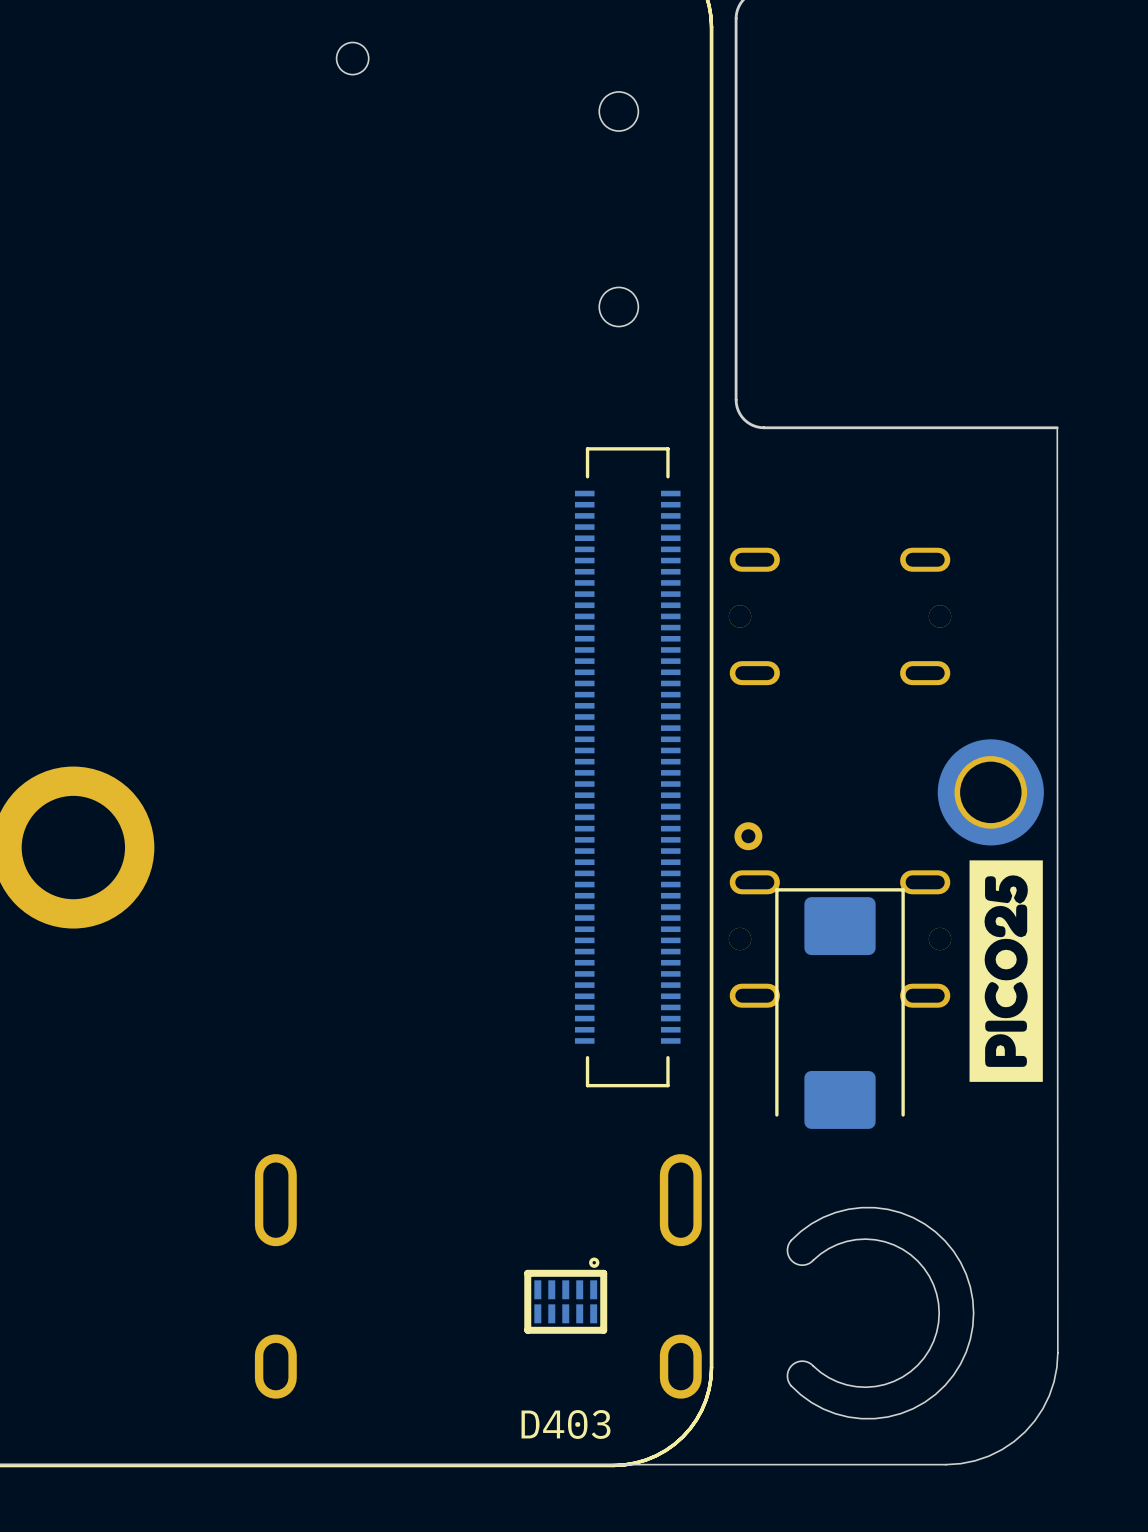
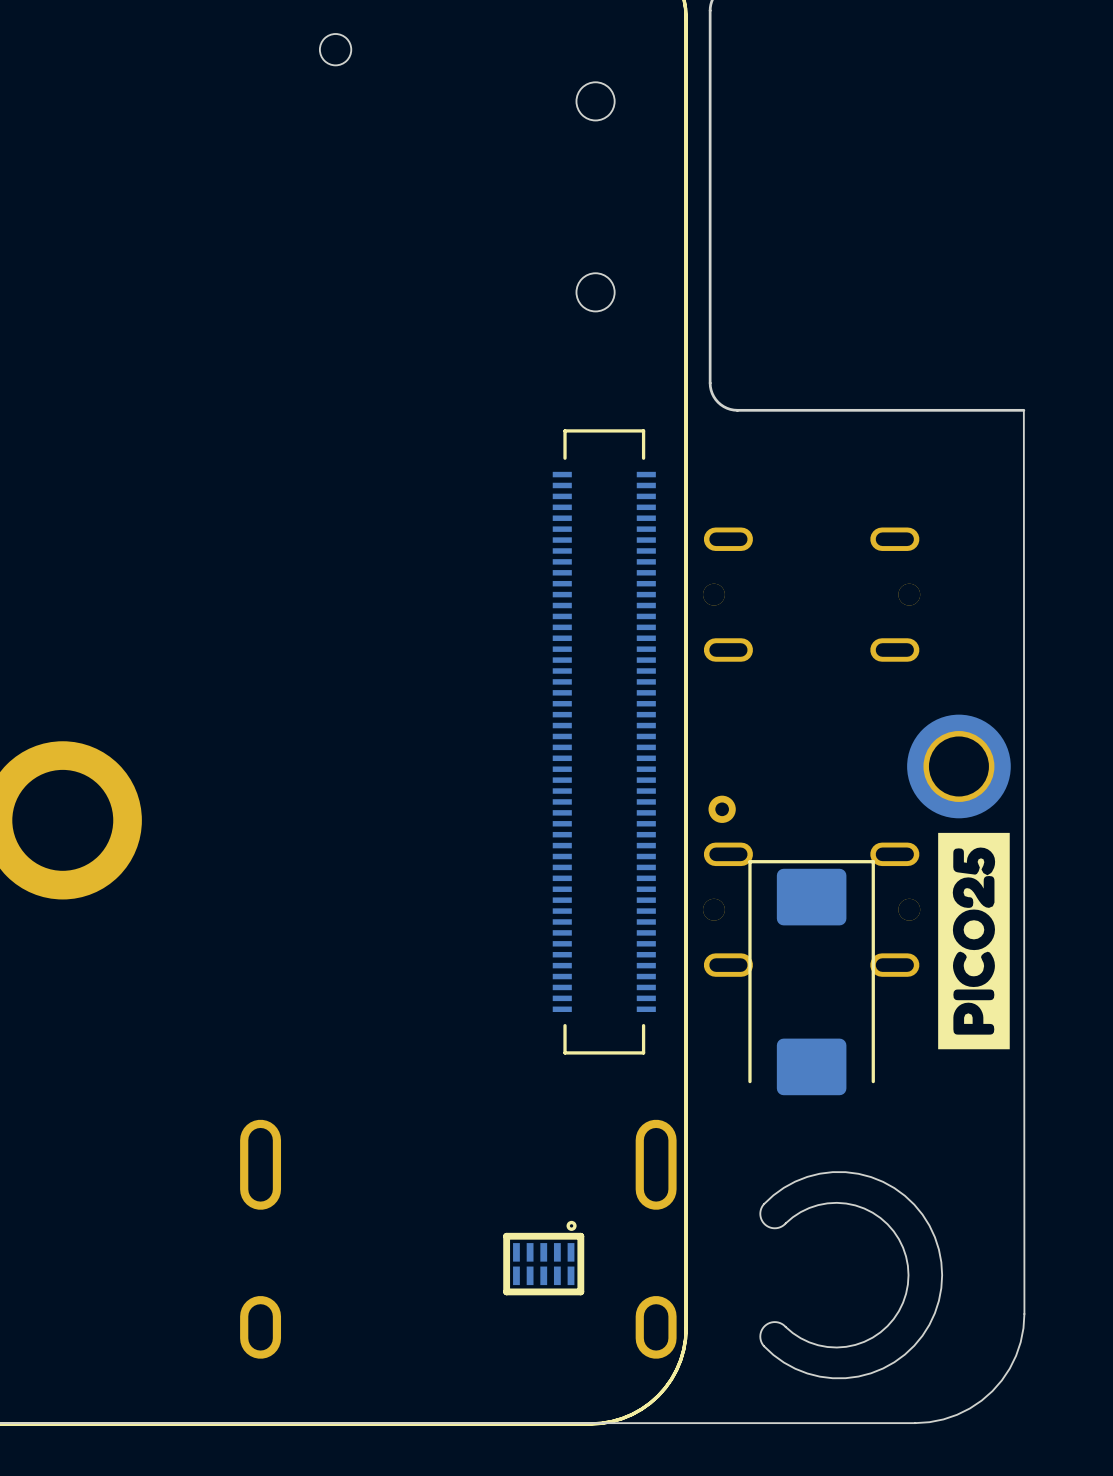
D403 name: D403 (566, 1424) -> none

